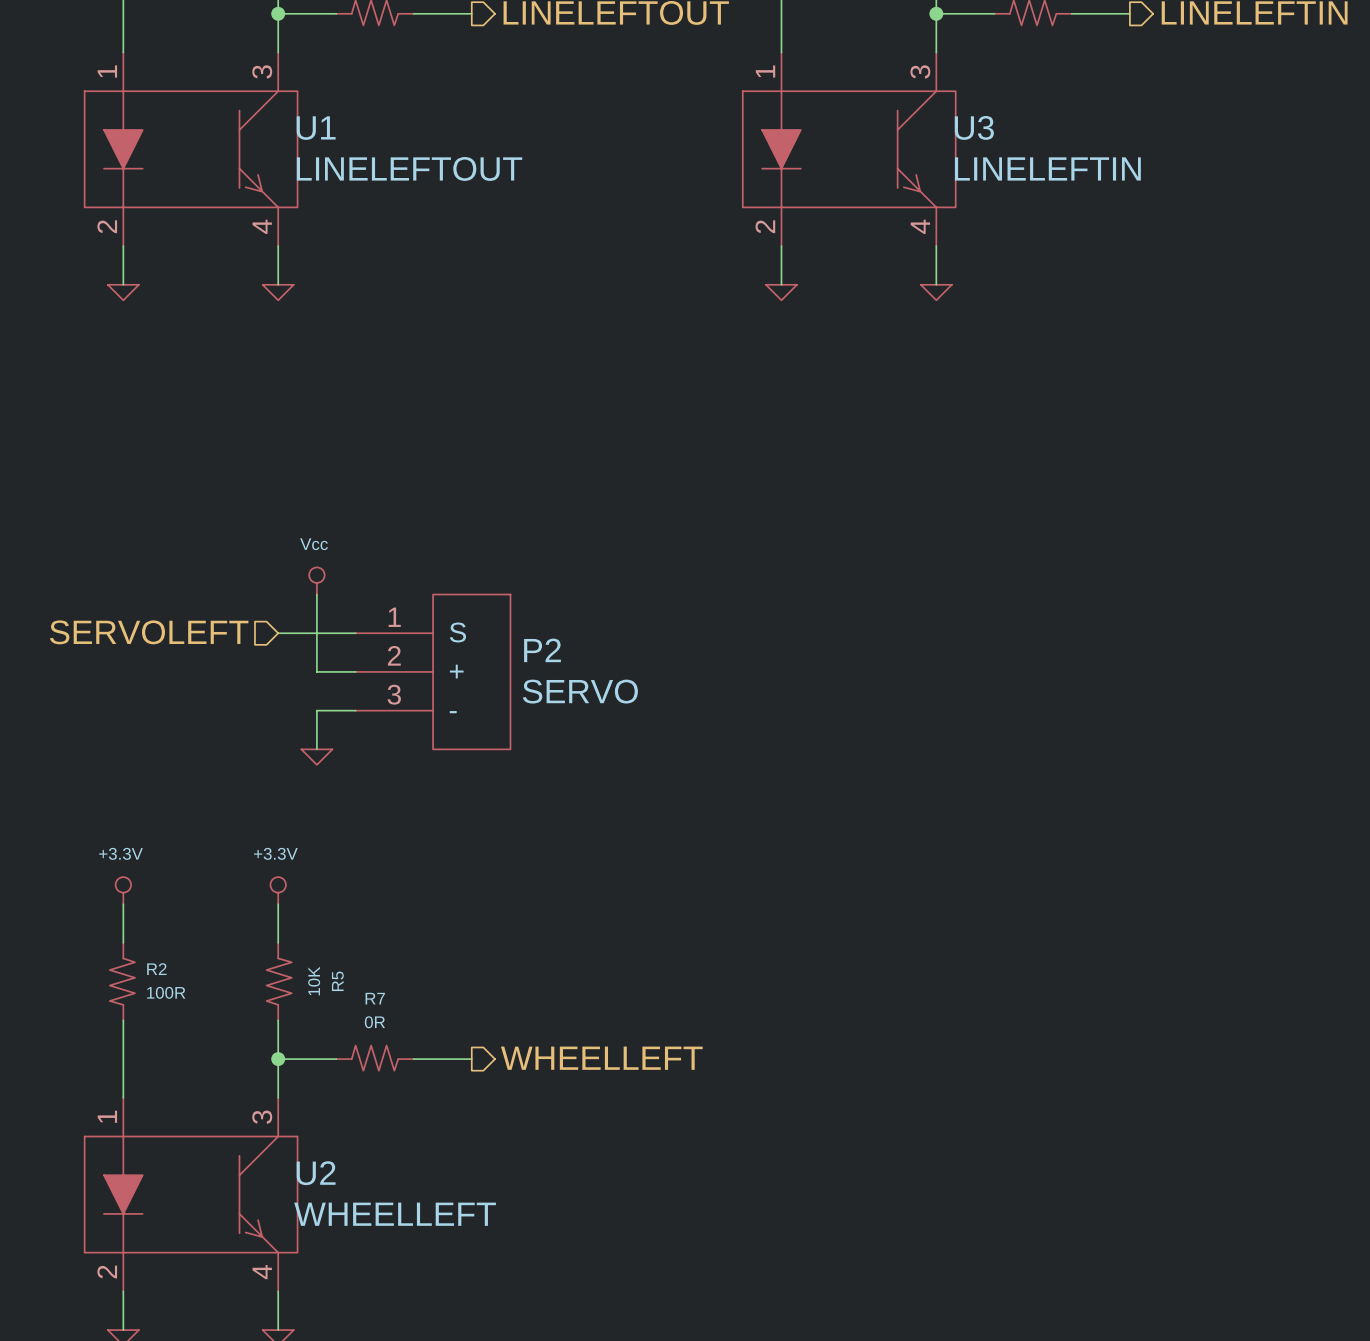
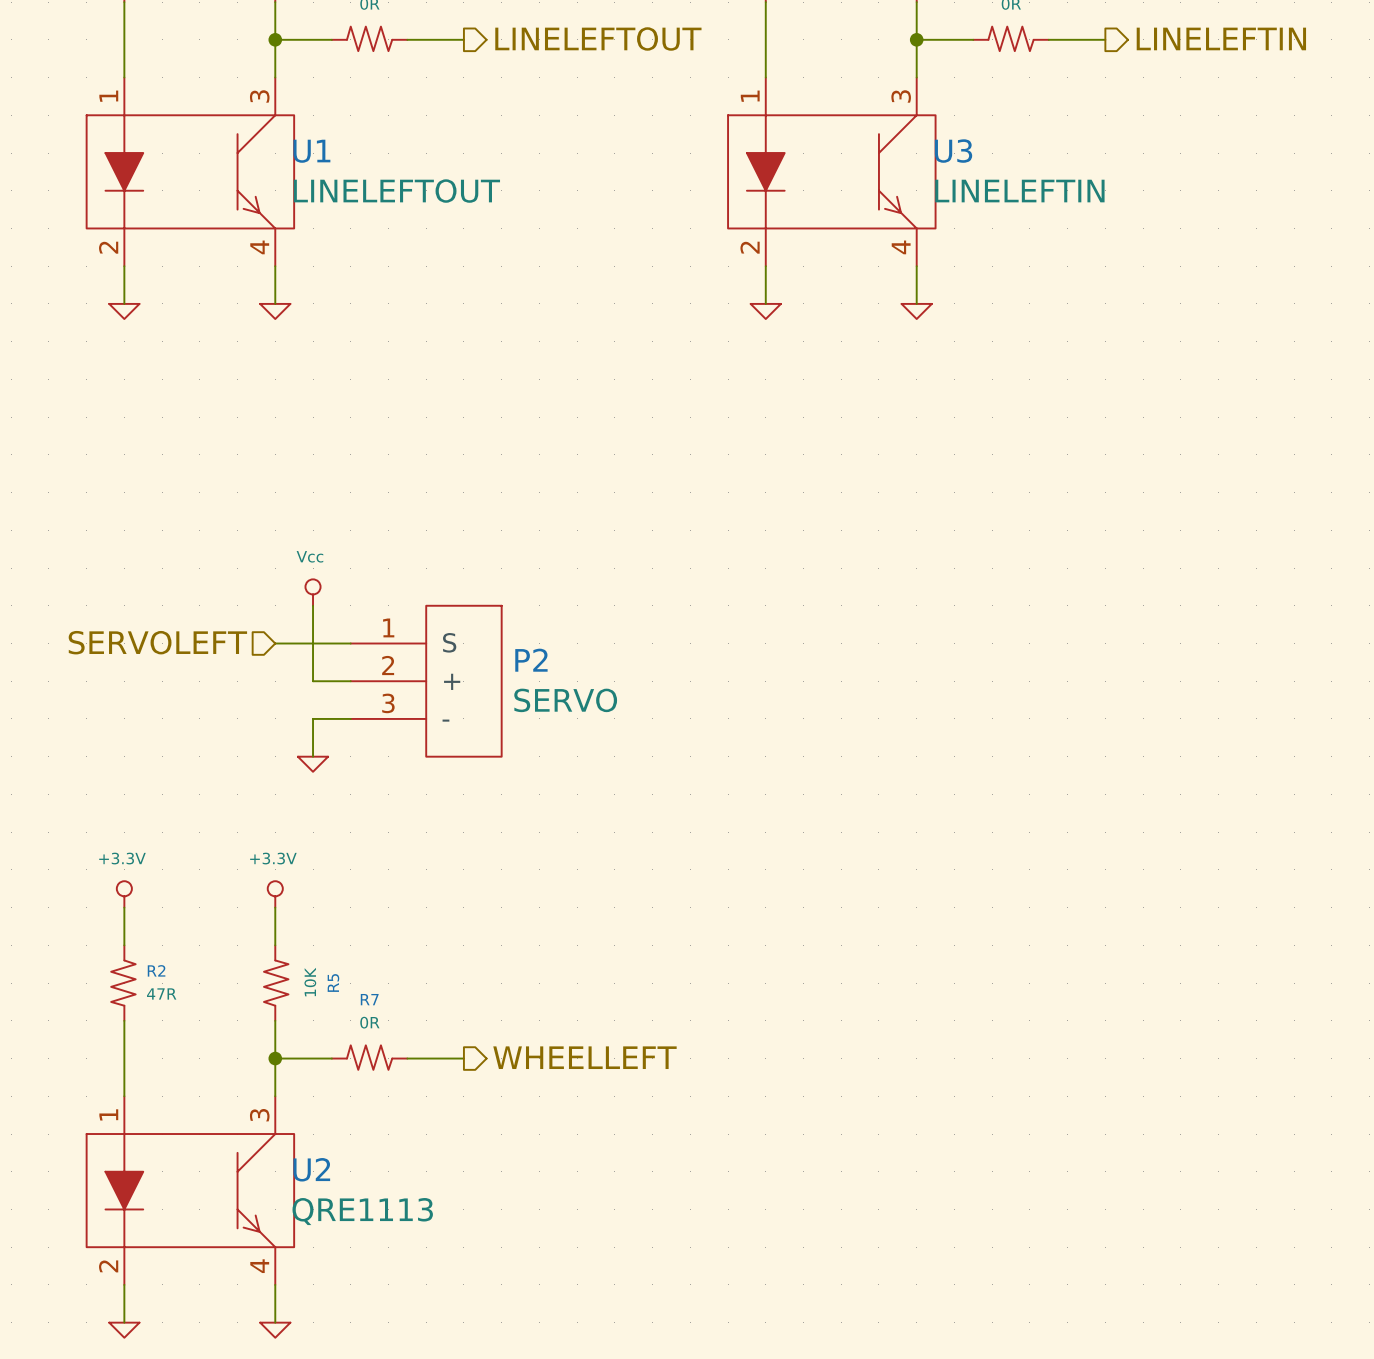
R2 value: 100R (166, 992) -> 47R (161, 993)
U2 value: WHEELLEFT (395, 1214) -> QRE1113 (362, 1211)

